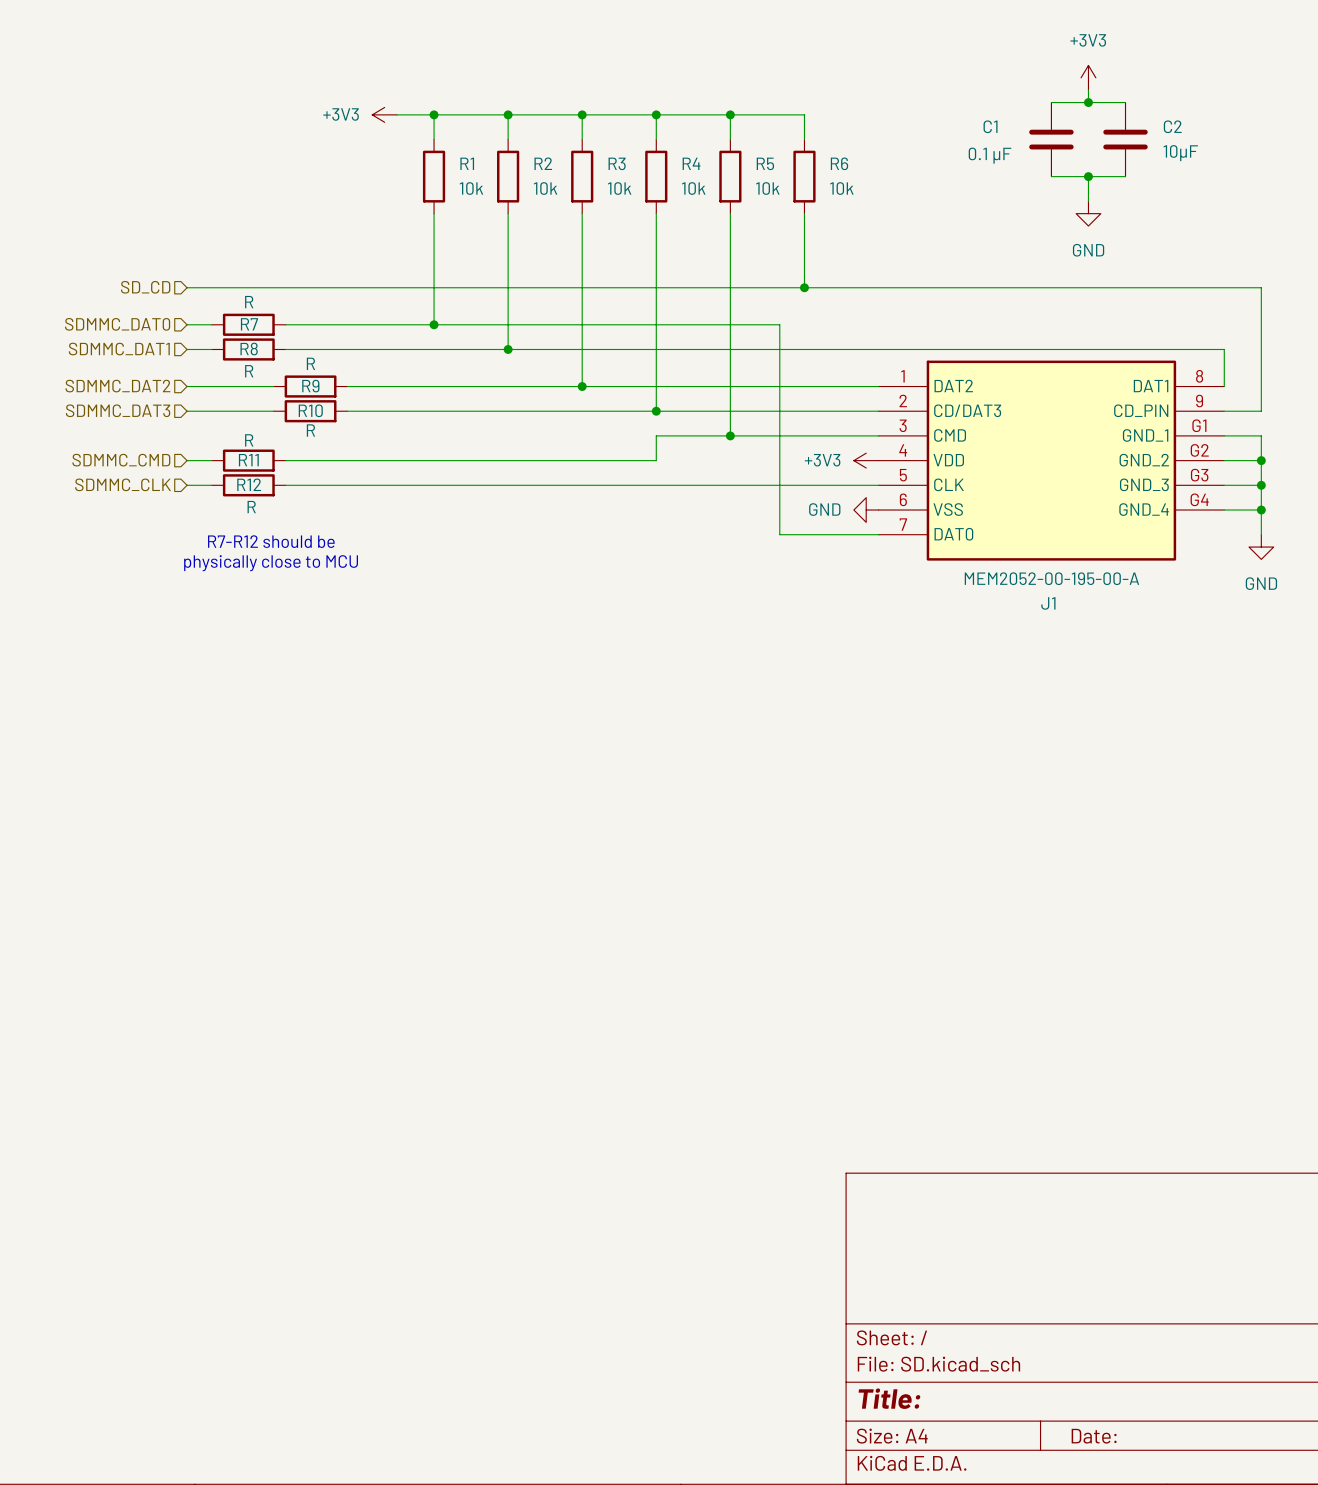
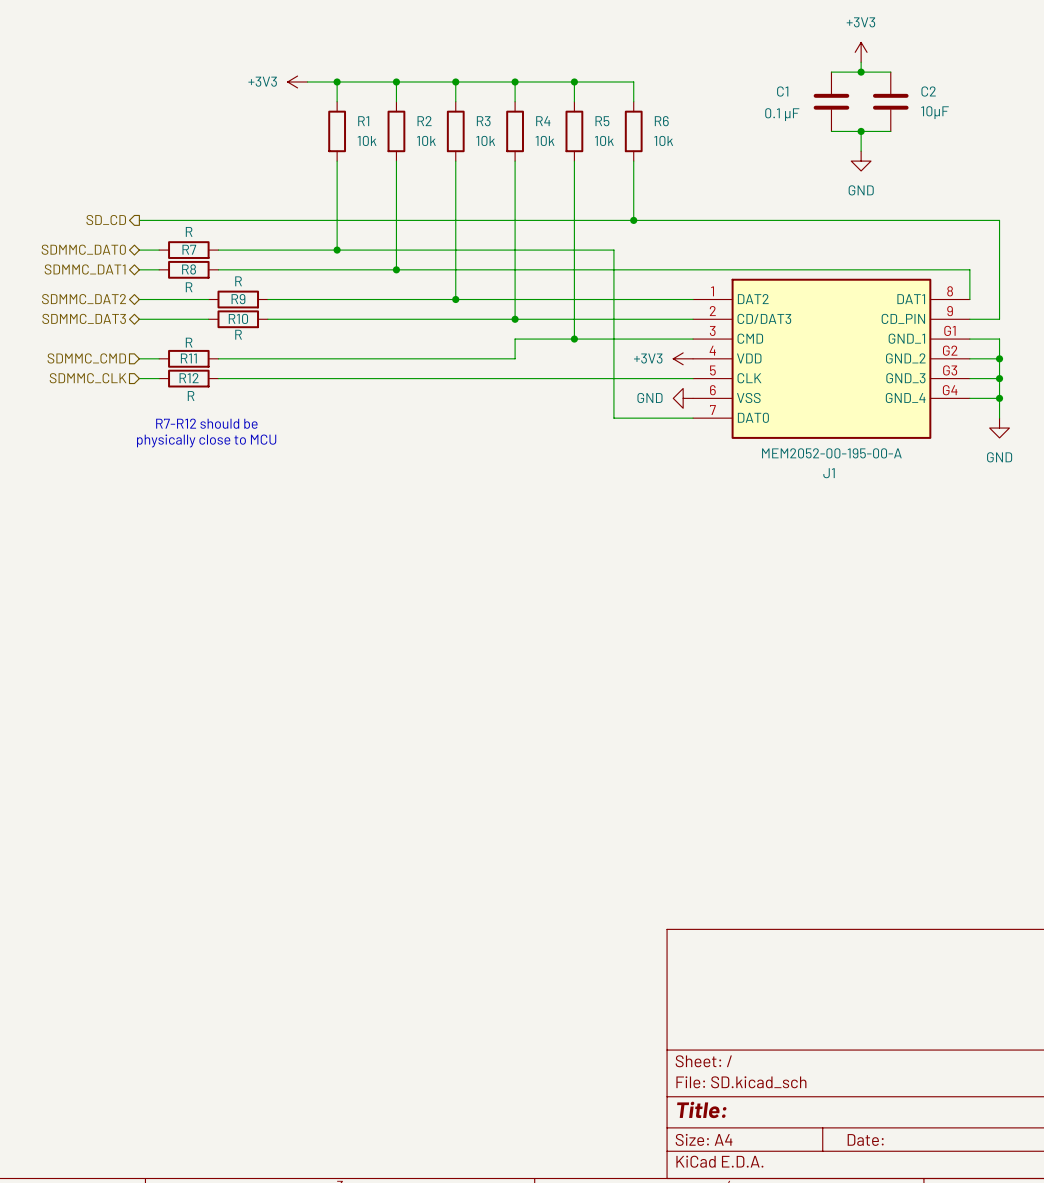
hierarchical label shape: input (145, 287) -> output (106, 220)
hierarchical label shape: input (117, 324) -> bidirectional (83, 249)
hierarchical label shape: input (119, 349) -> bidirectional (85, 269)
hierarchical label shape: input (117, 386) -> bidirectional (84, 299)
hierarchical label shape: input (118, 410) -> bidirectional (84, 318)

